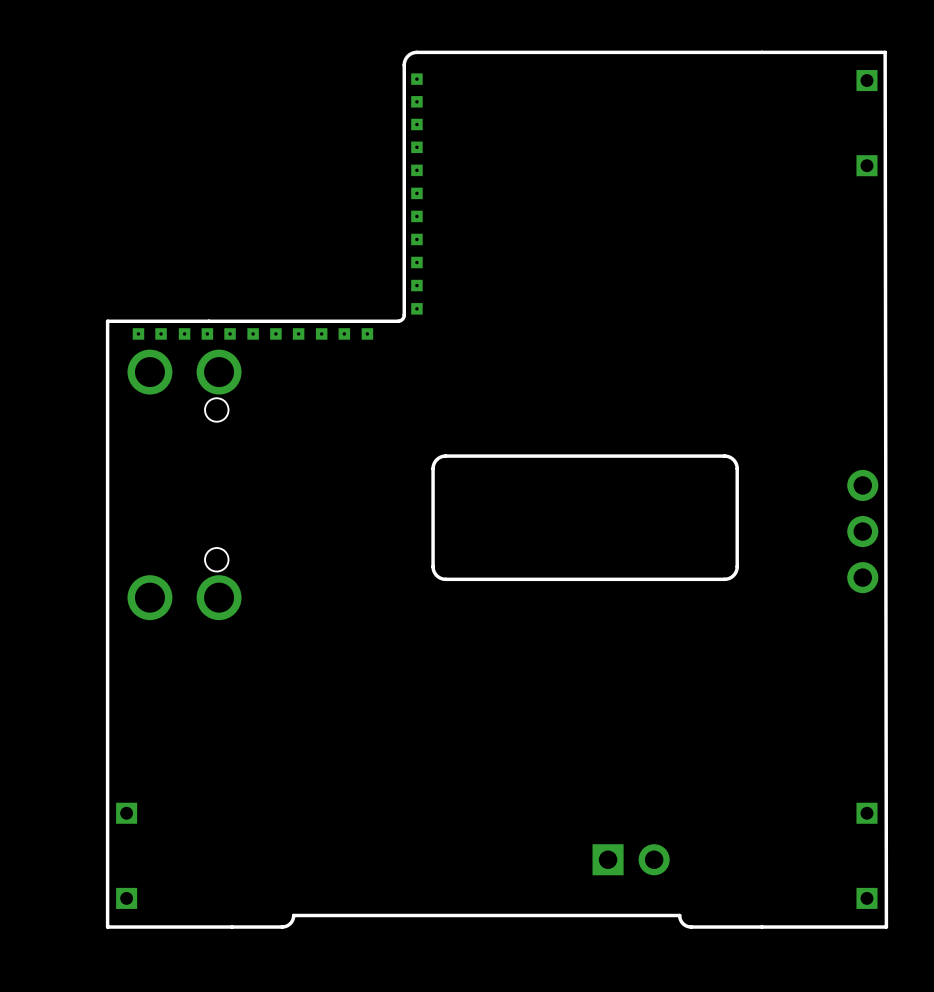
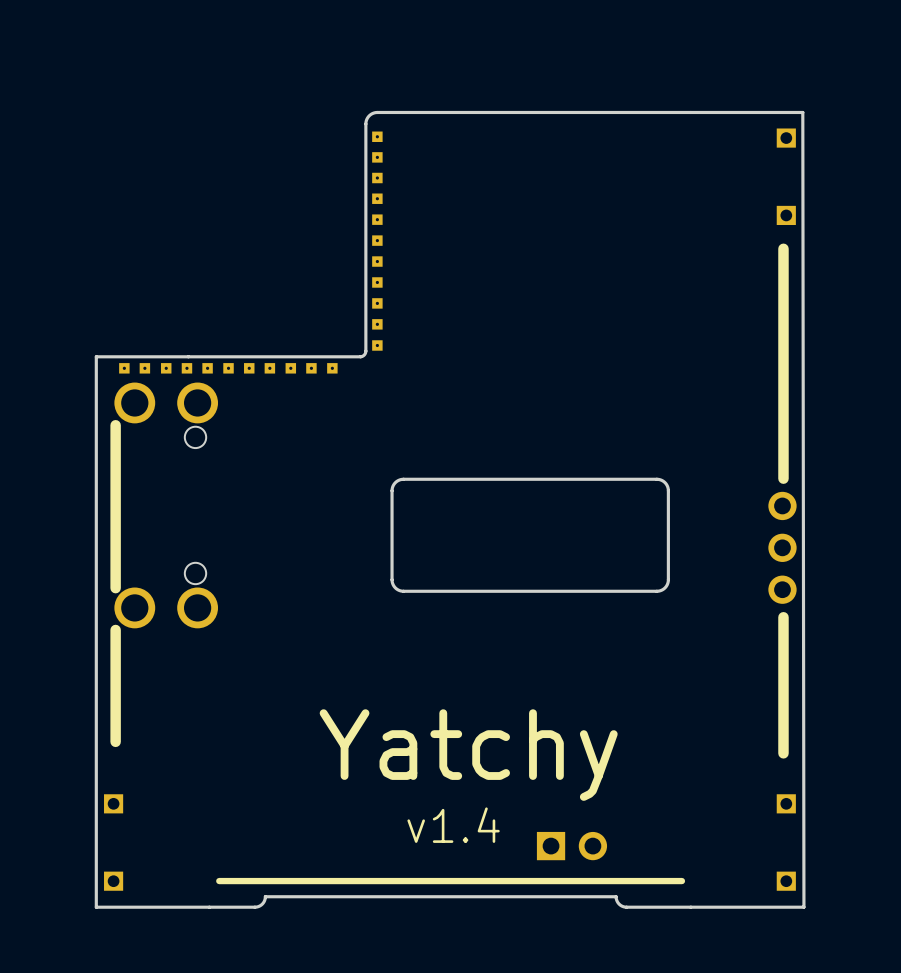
drawing: none -> [110, 243, 789, 885]
text: none -> Yatchy (468, 755)
text: none -> v1.4 (453, 825)

